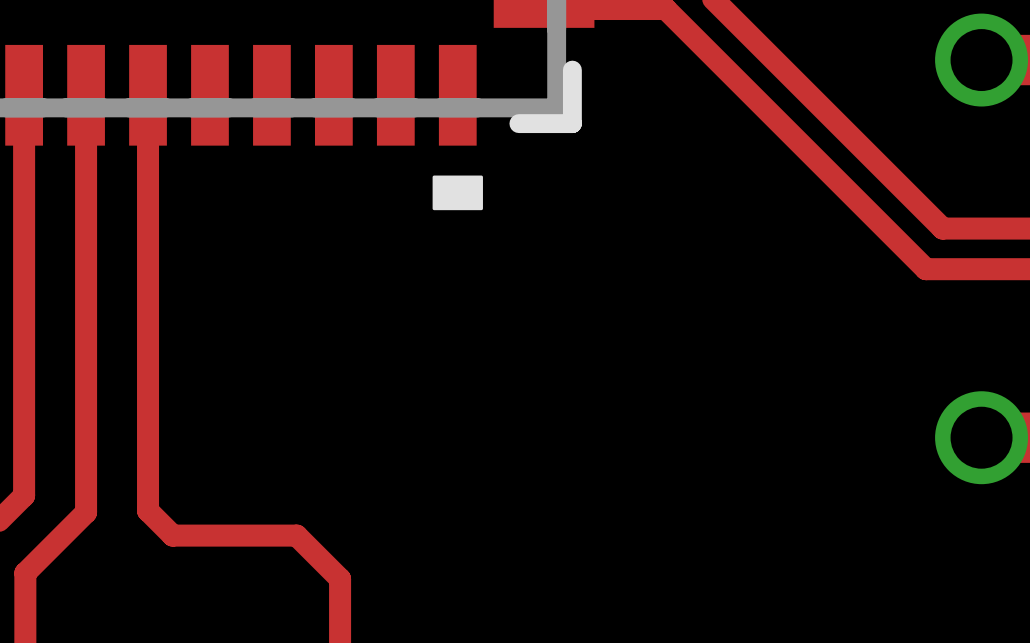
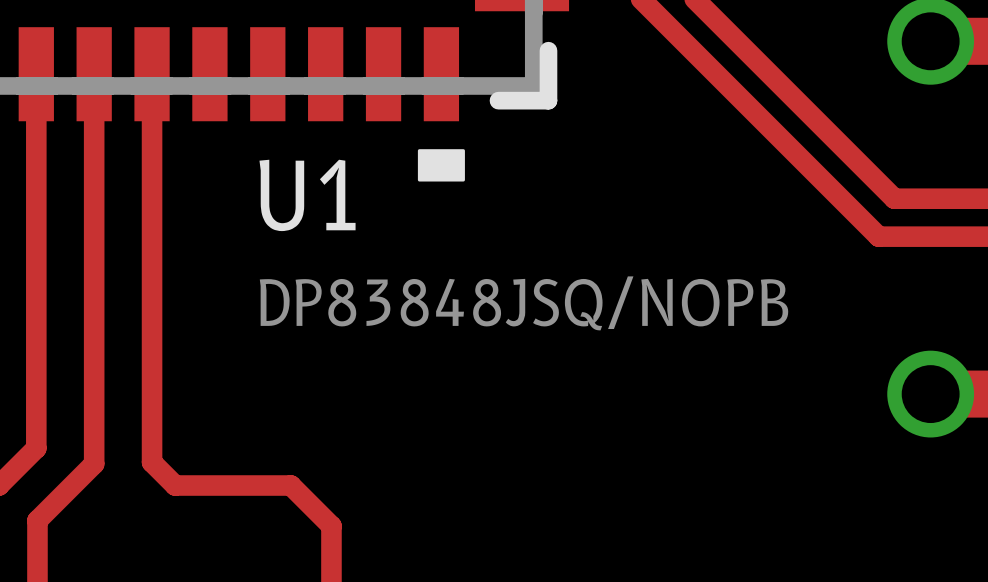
U1 name: none -> U1 (307, 195)
U1 value: none -> DP83848JSQ/NOPB (524, 303)

